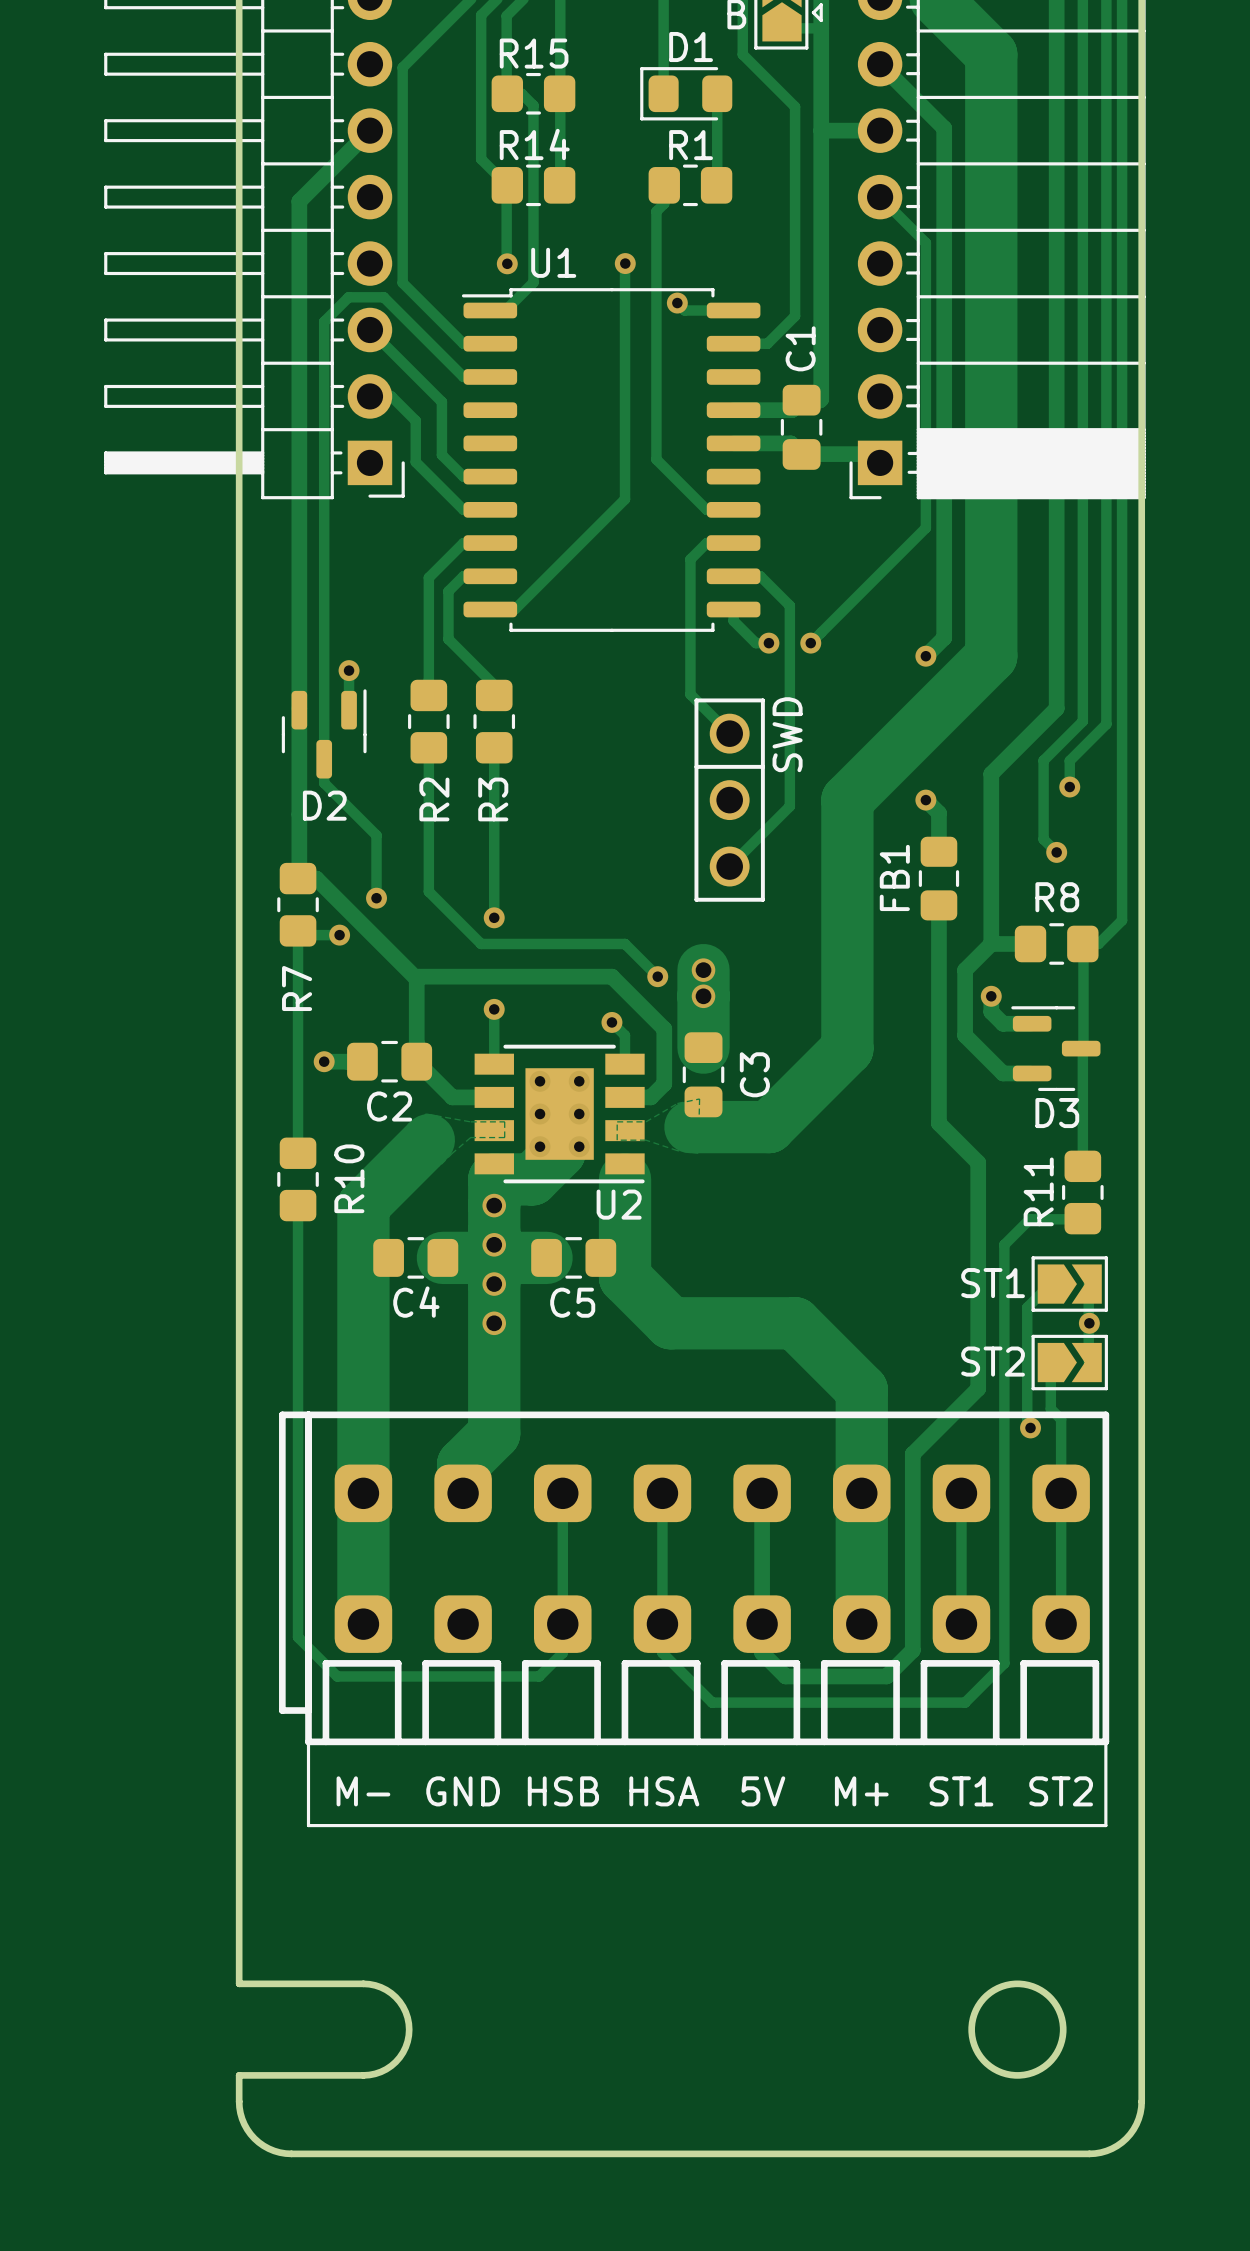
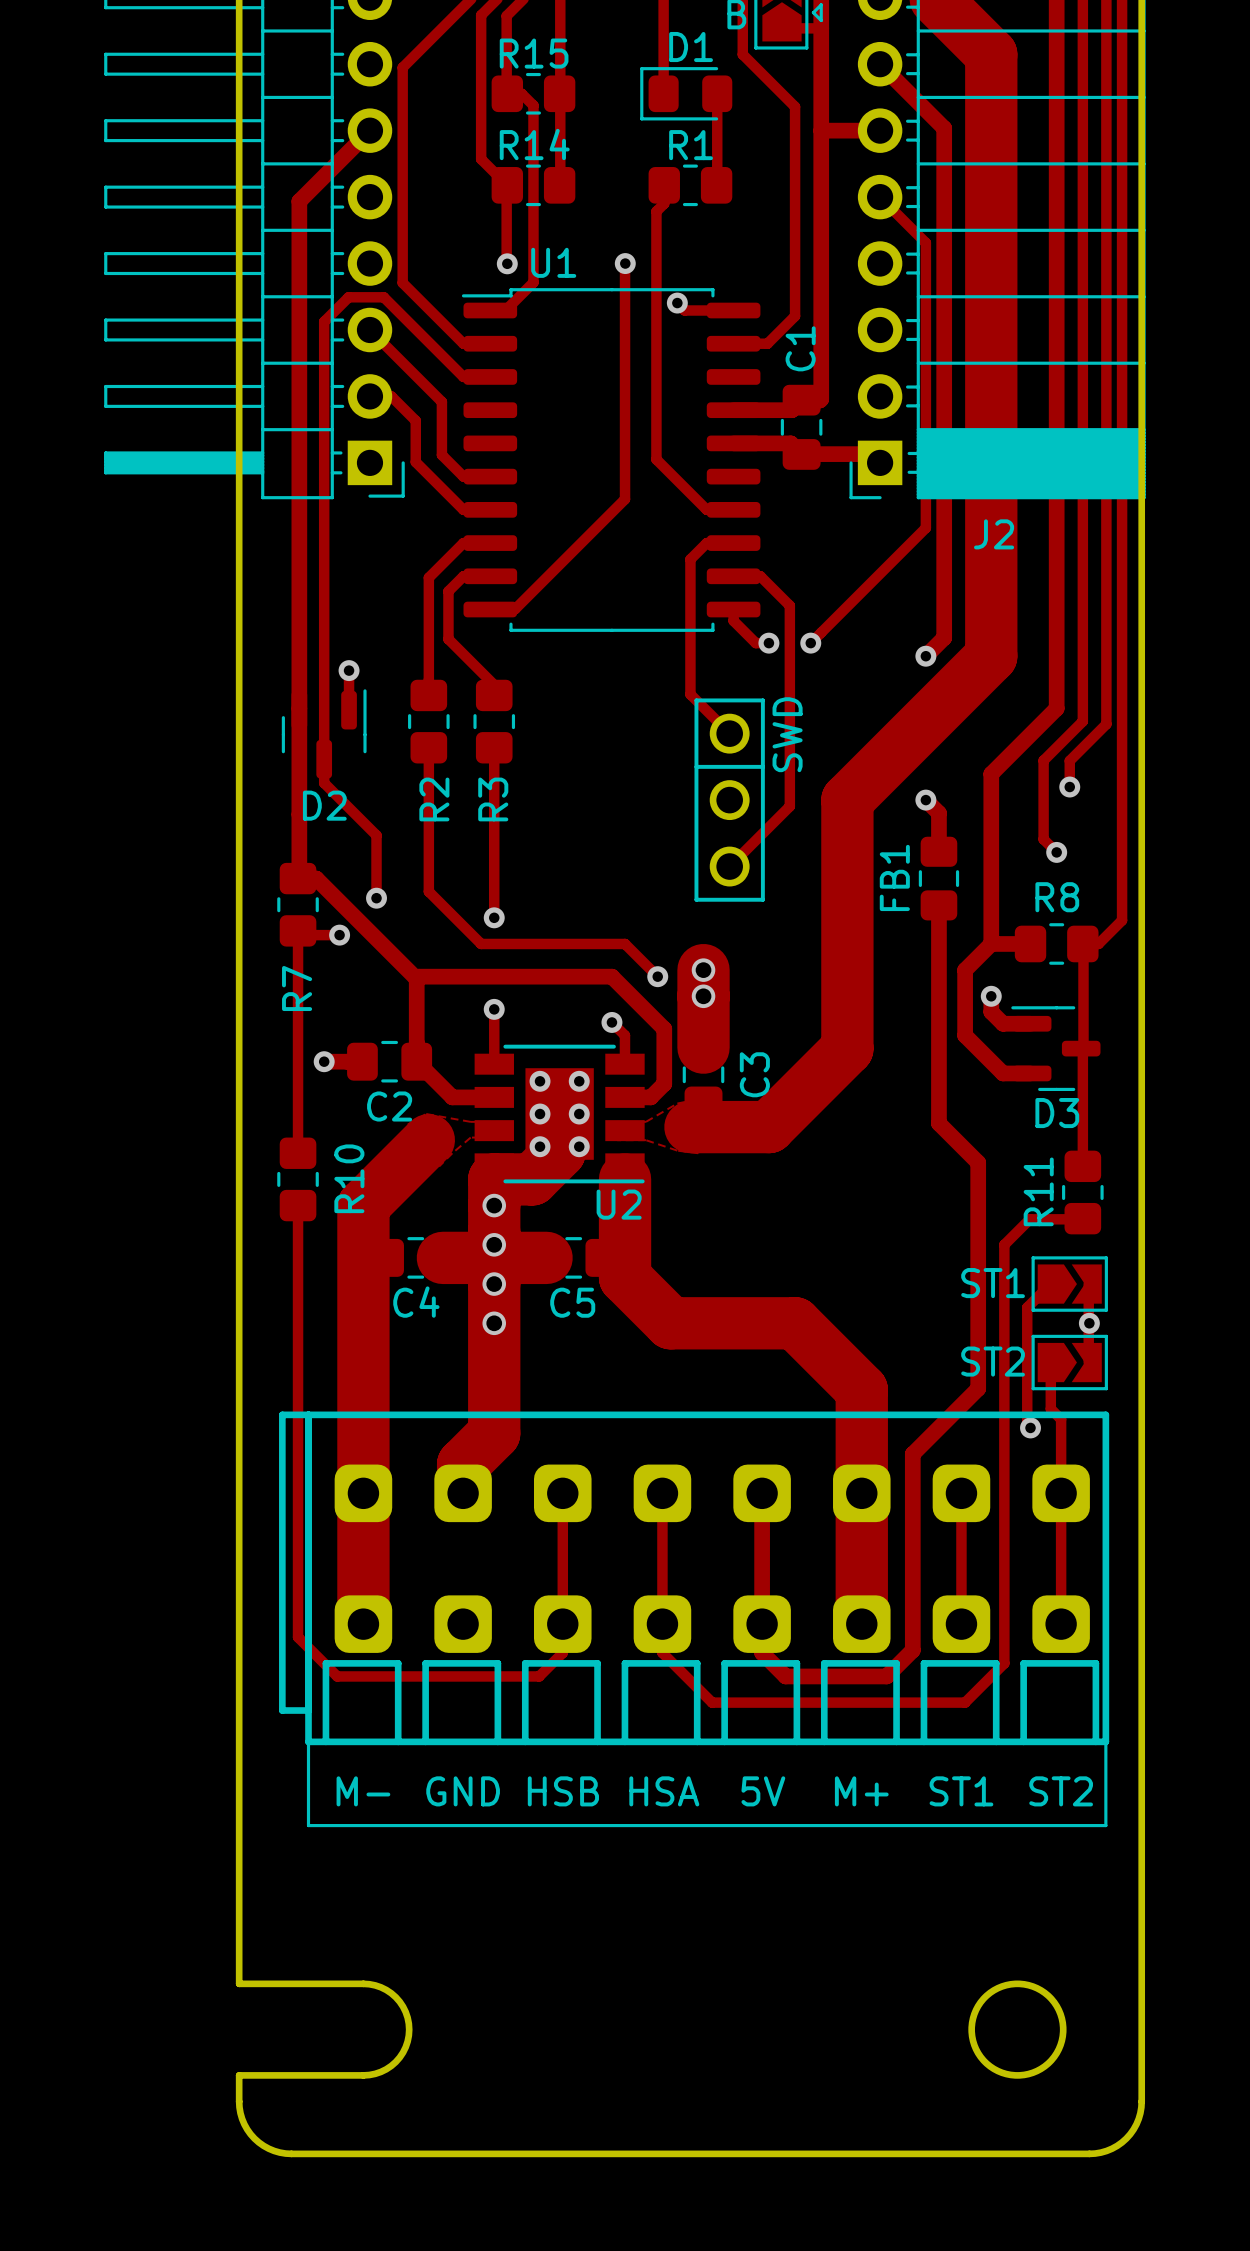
J2 name: none -> J2 (994, 534)

